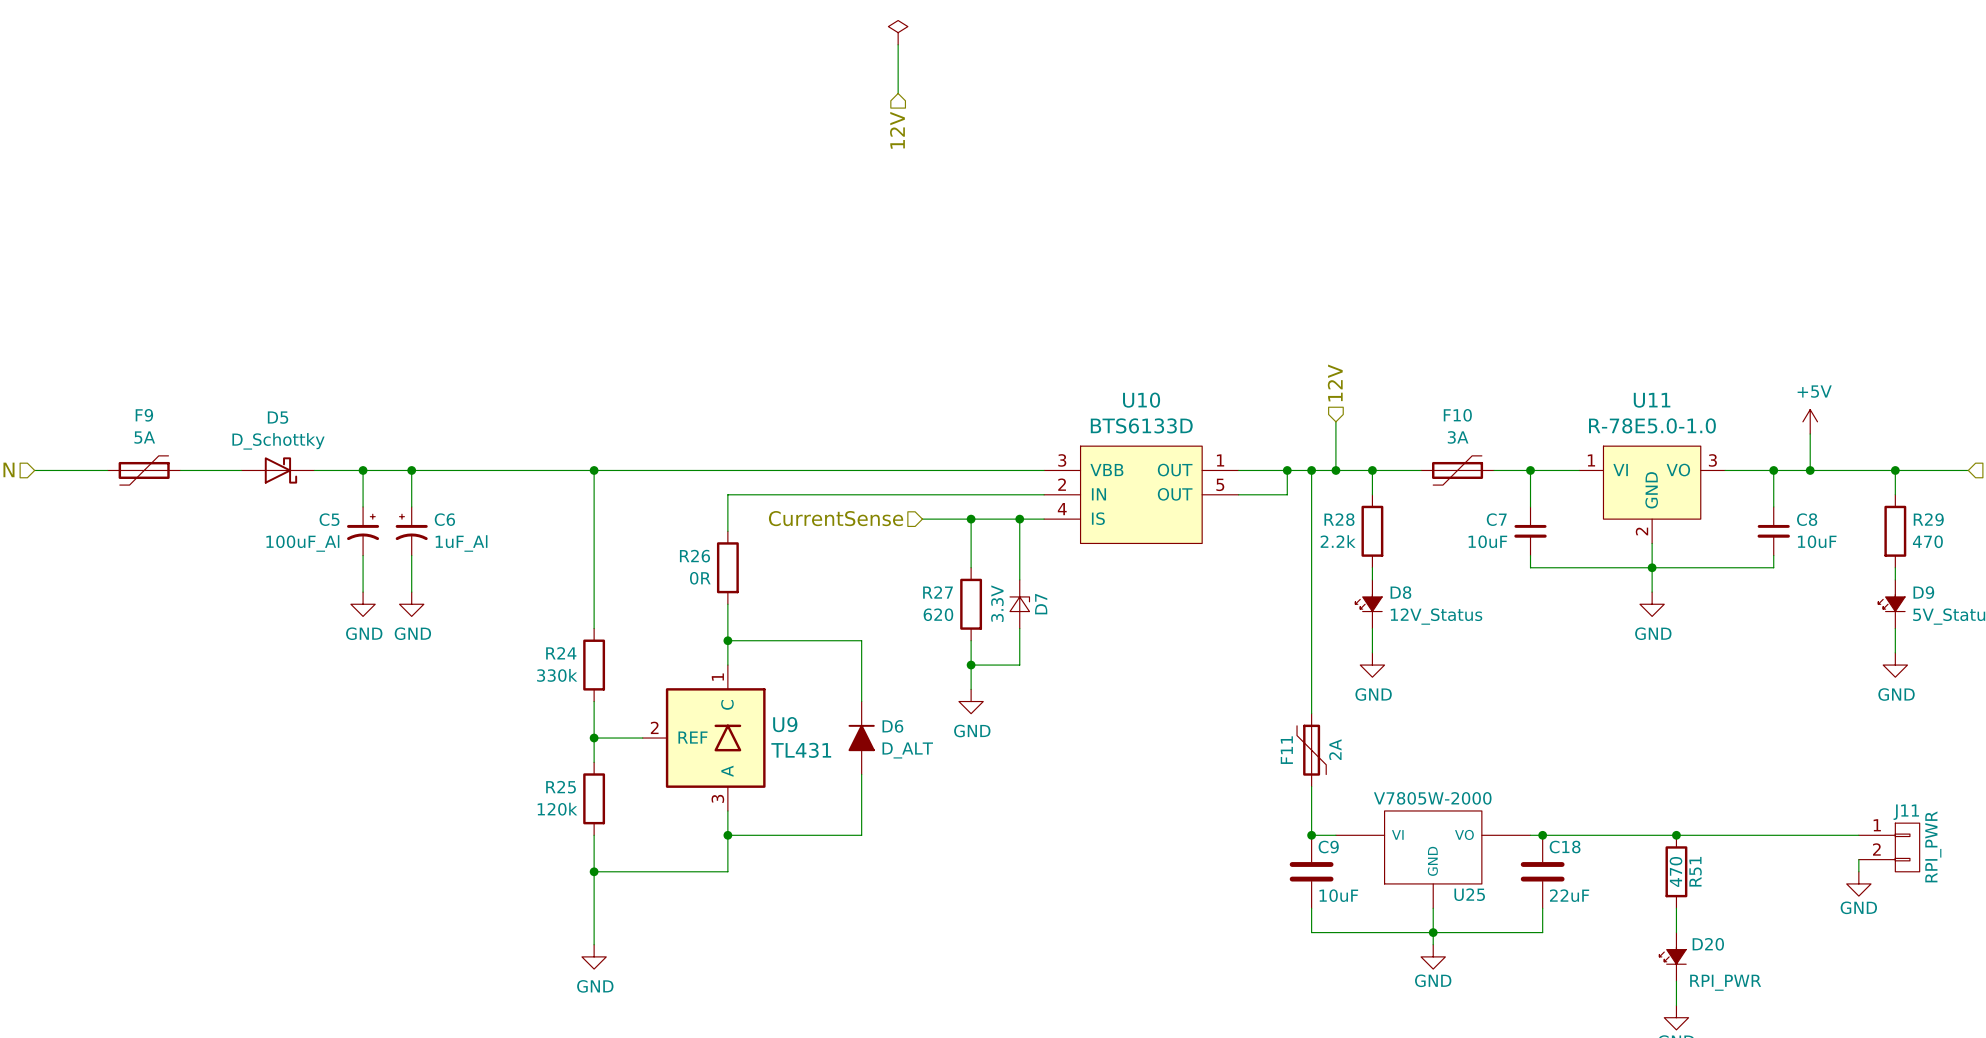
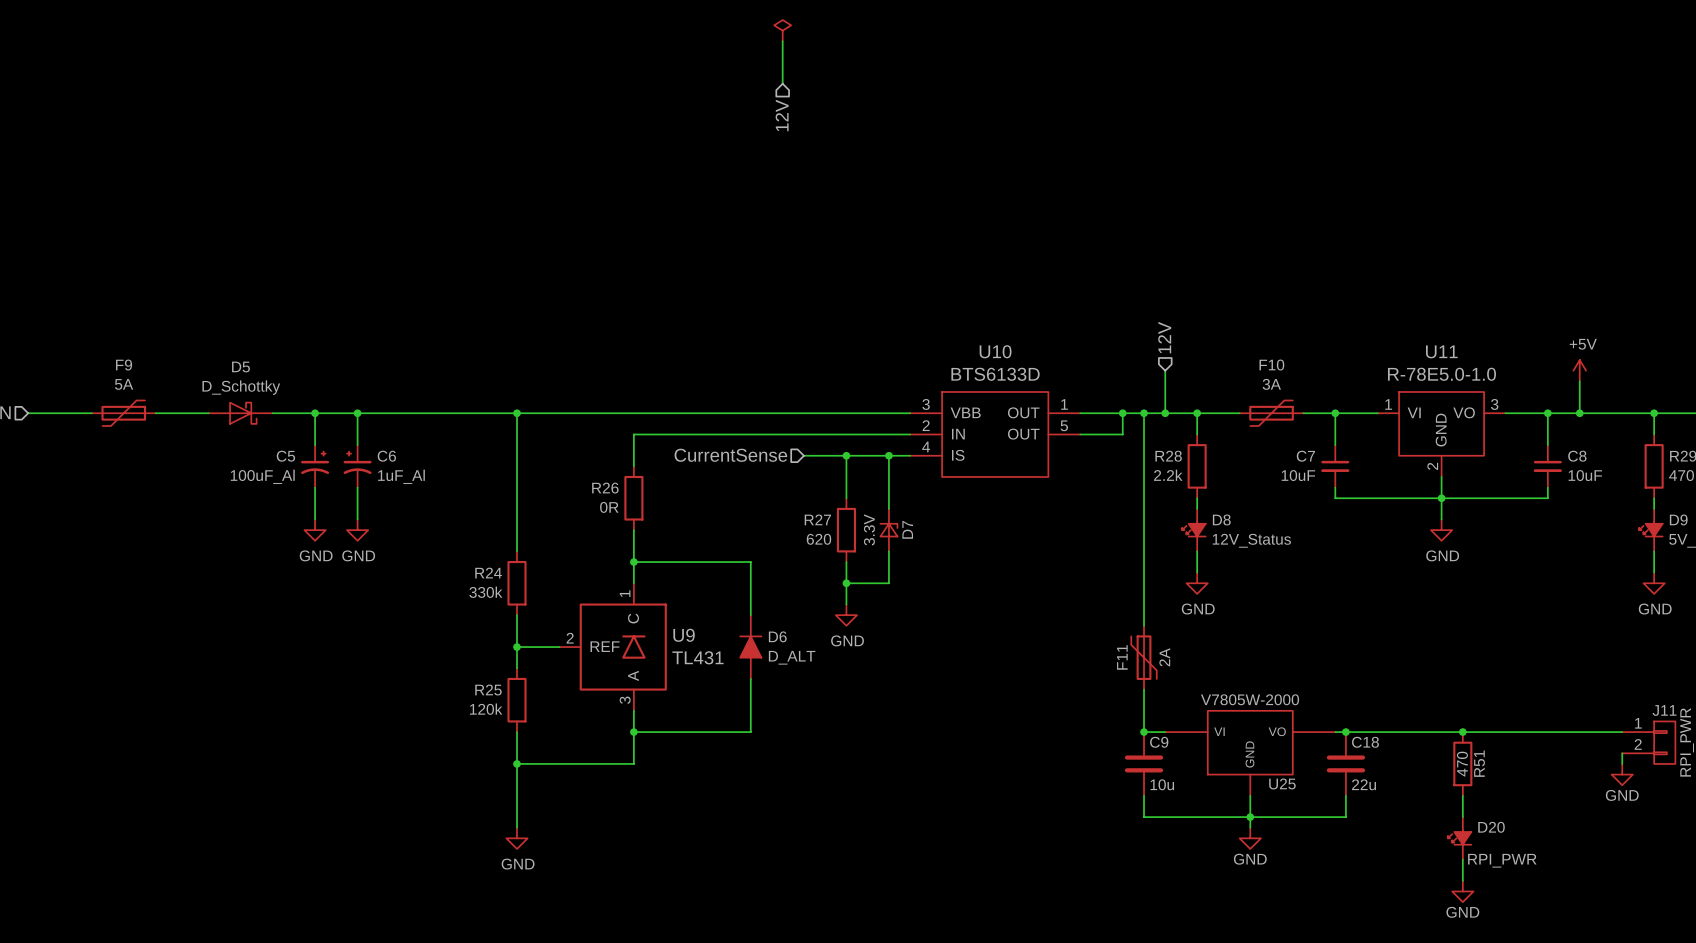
C9 value: 10uF (1338, 895) -> 10u (1162, 784)
C18 value: 22uF (1569, 895) -> 22u (1364, 784)

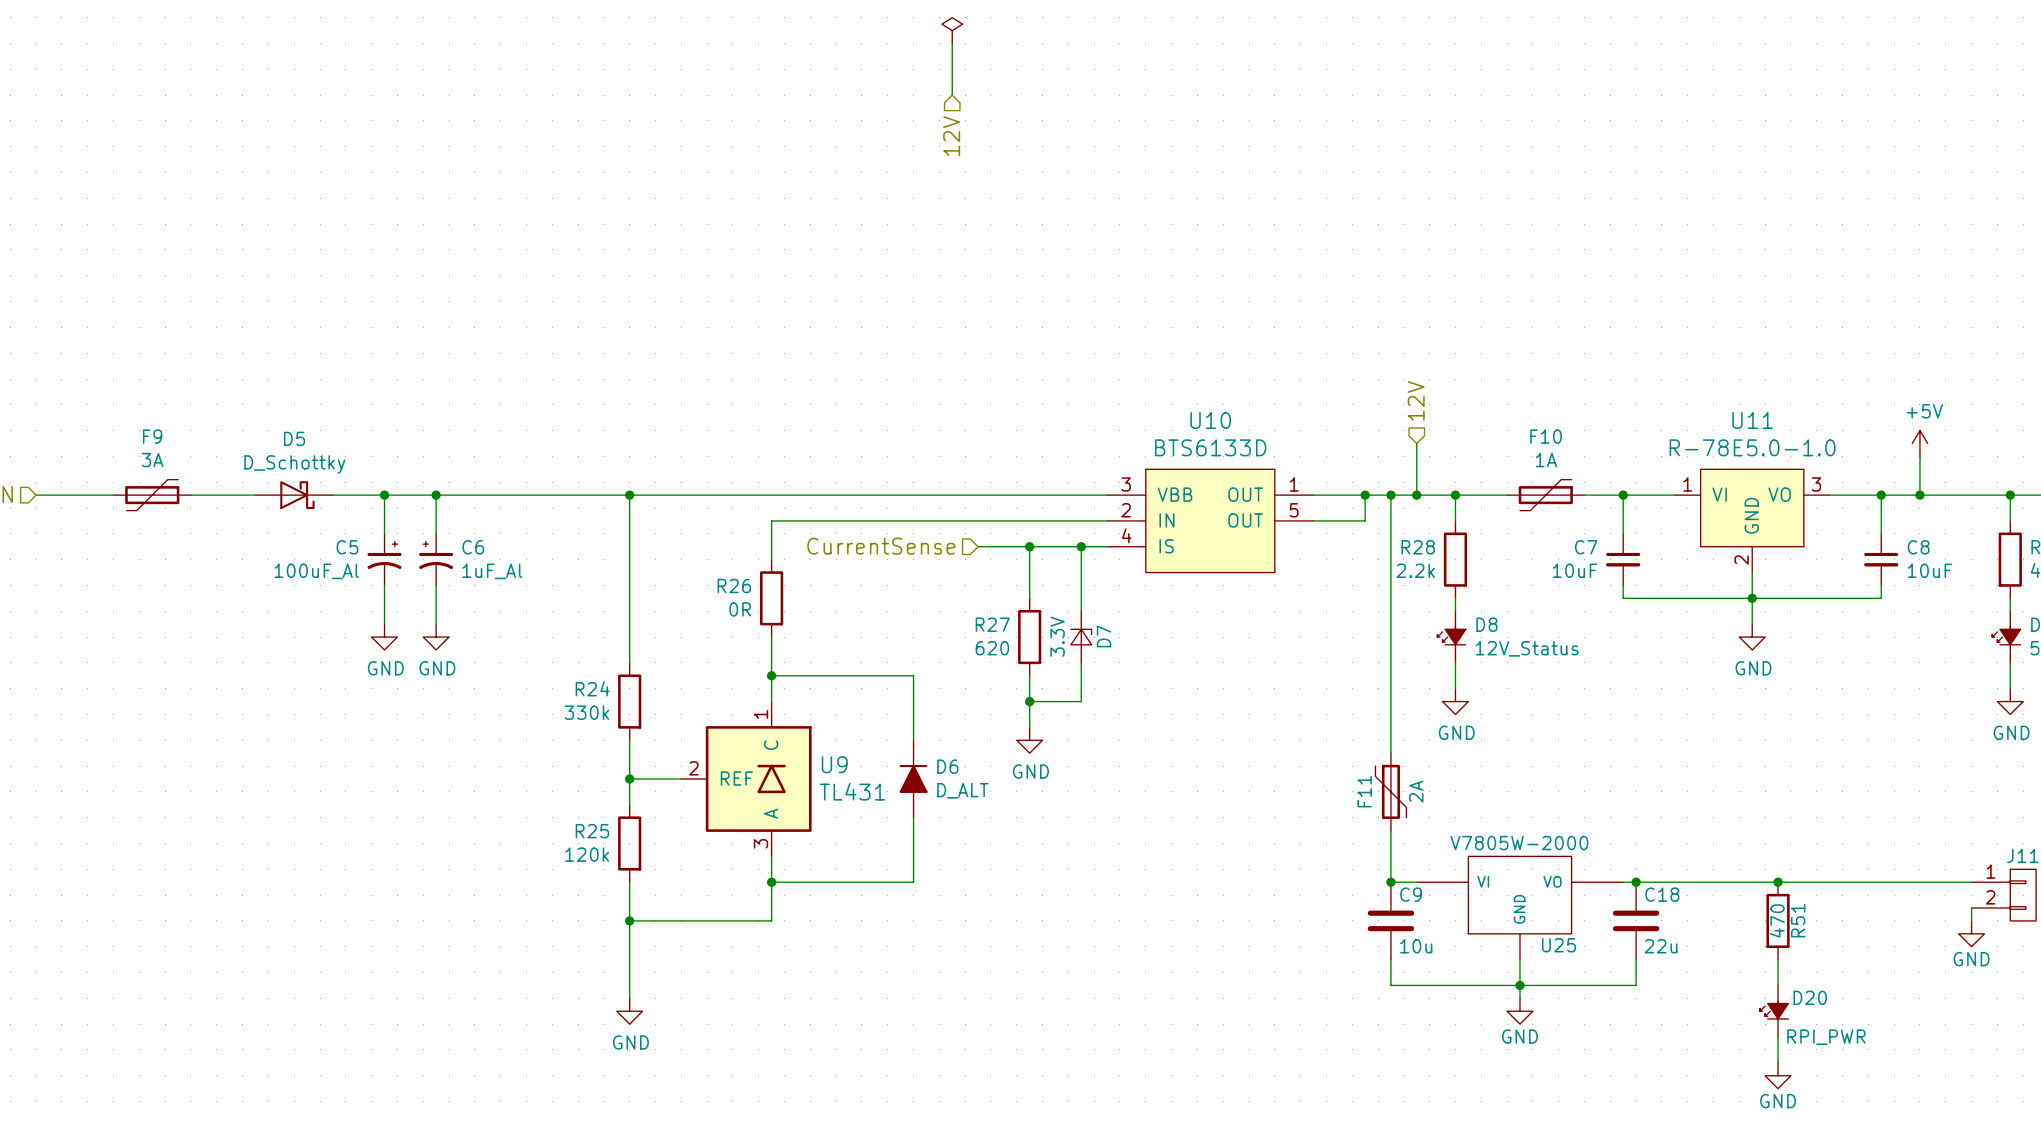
F9 value: 5A (124, 384) -> 3A (152, 460)
F10 value: 3A (1271, 384) -> 1A (1546, 460)

